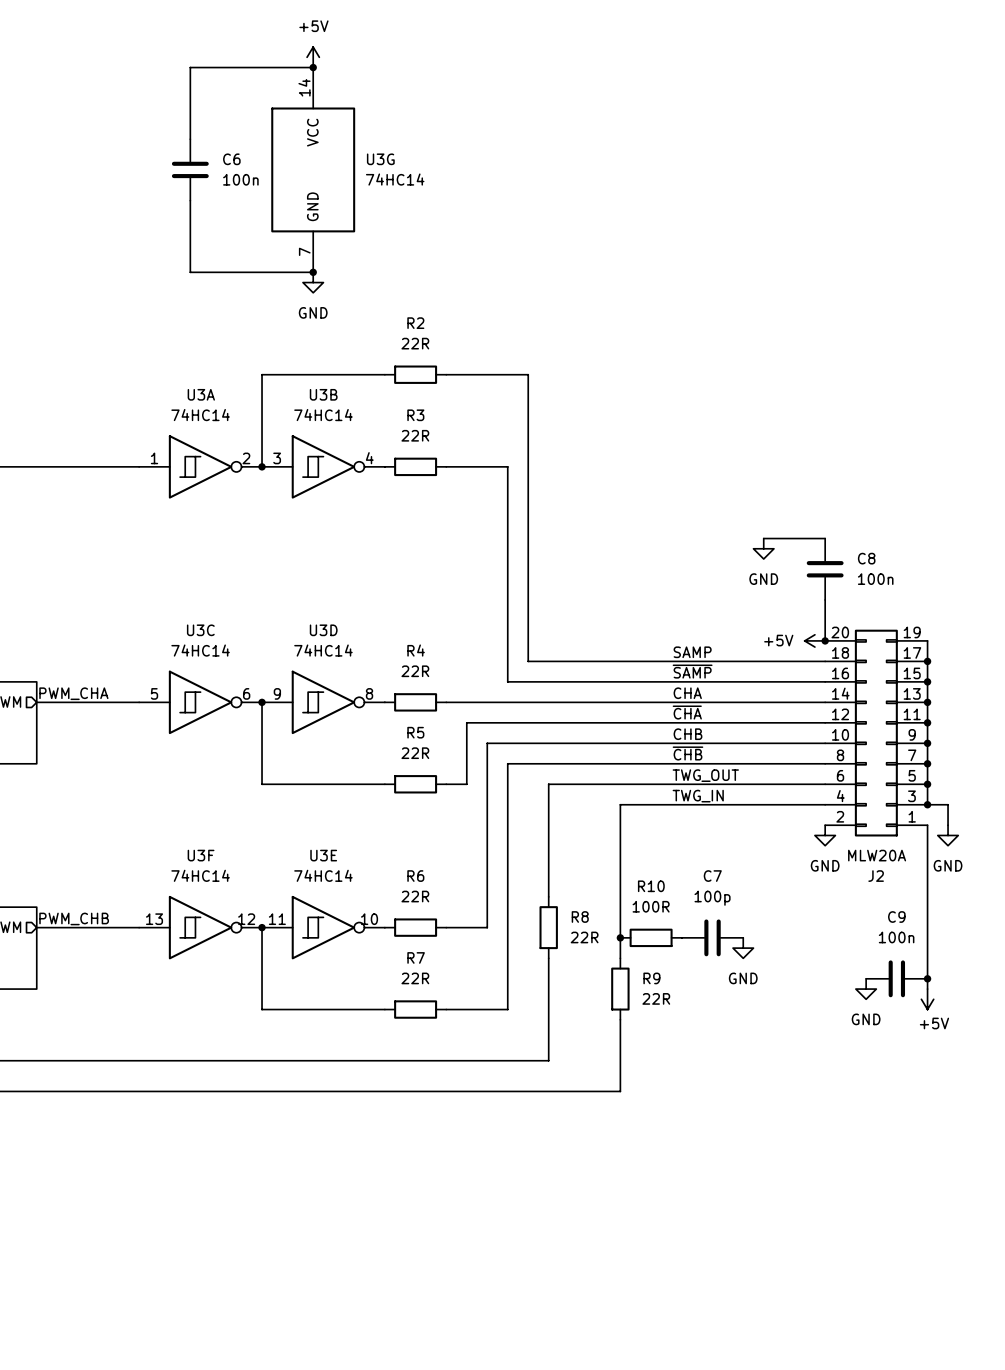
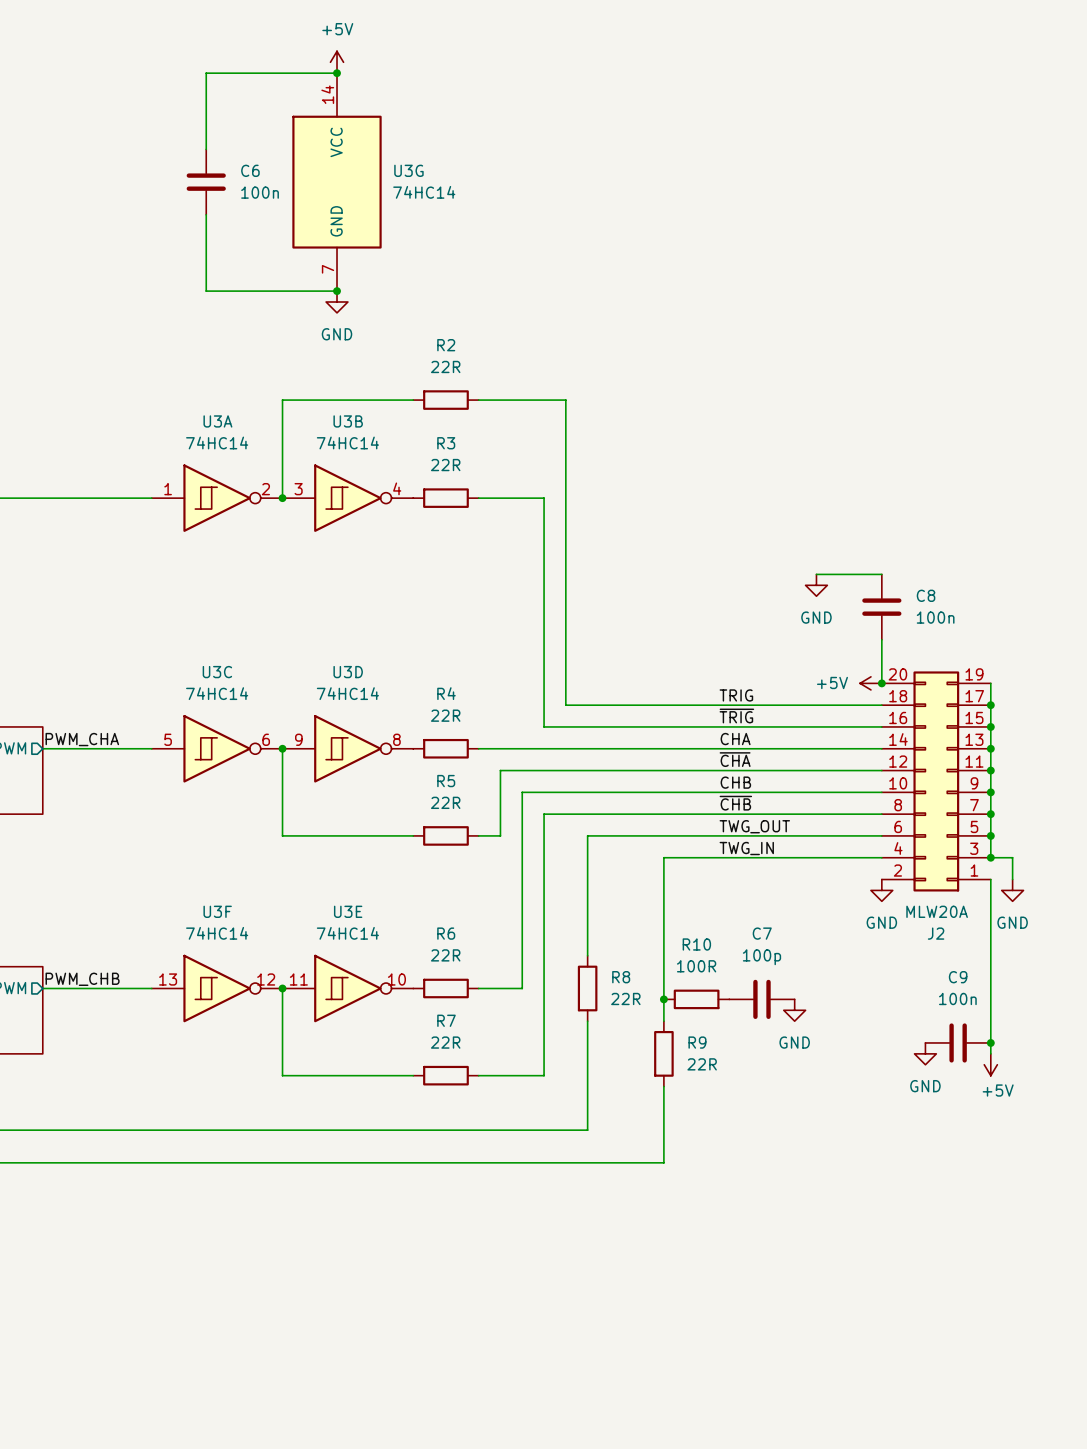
label: SAMP (692, 652) -> TRIG (736, 695)
label: ~{SAMP} (692, 671) -> ~{TRIG} (736, 715)

